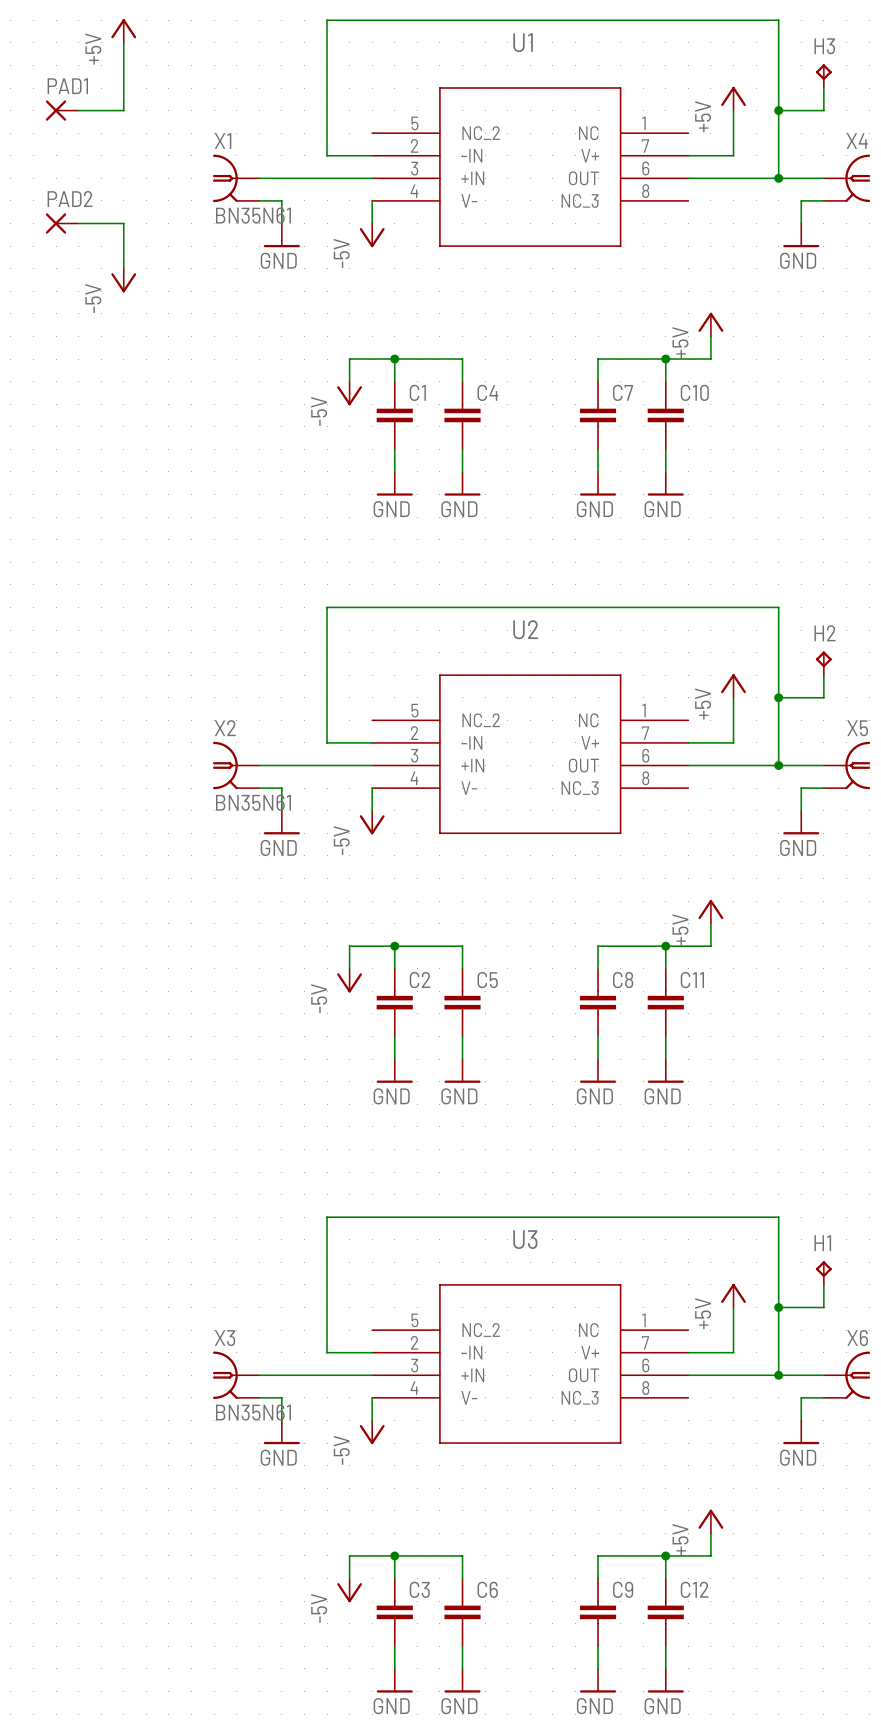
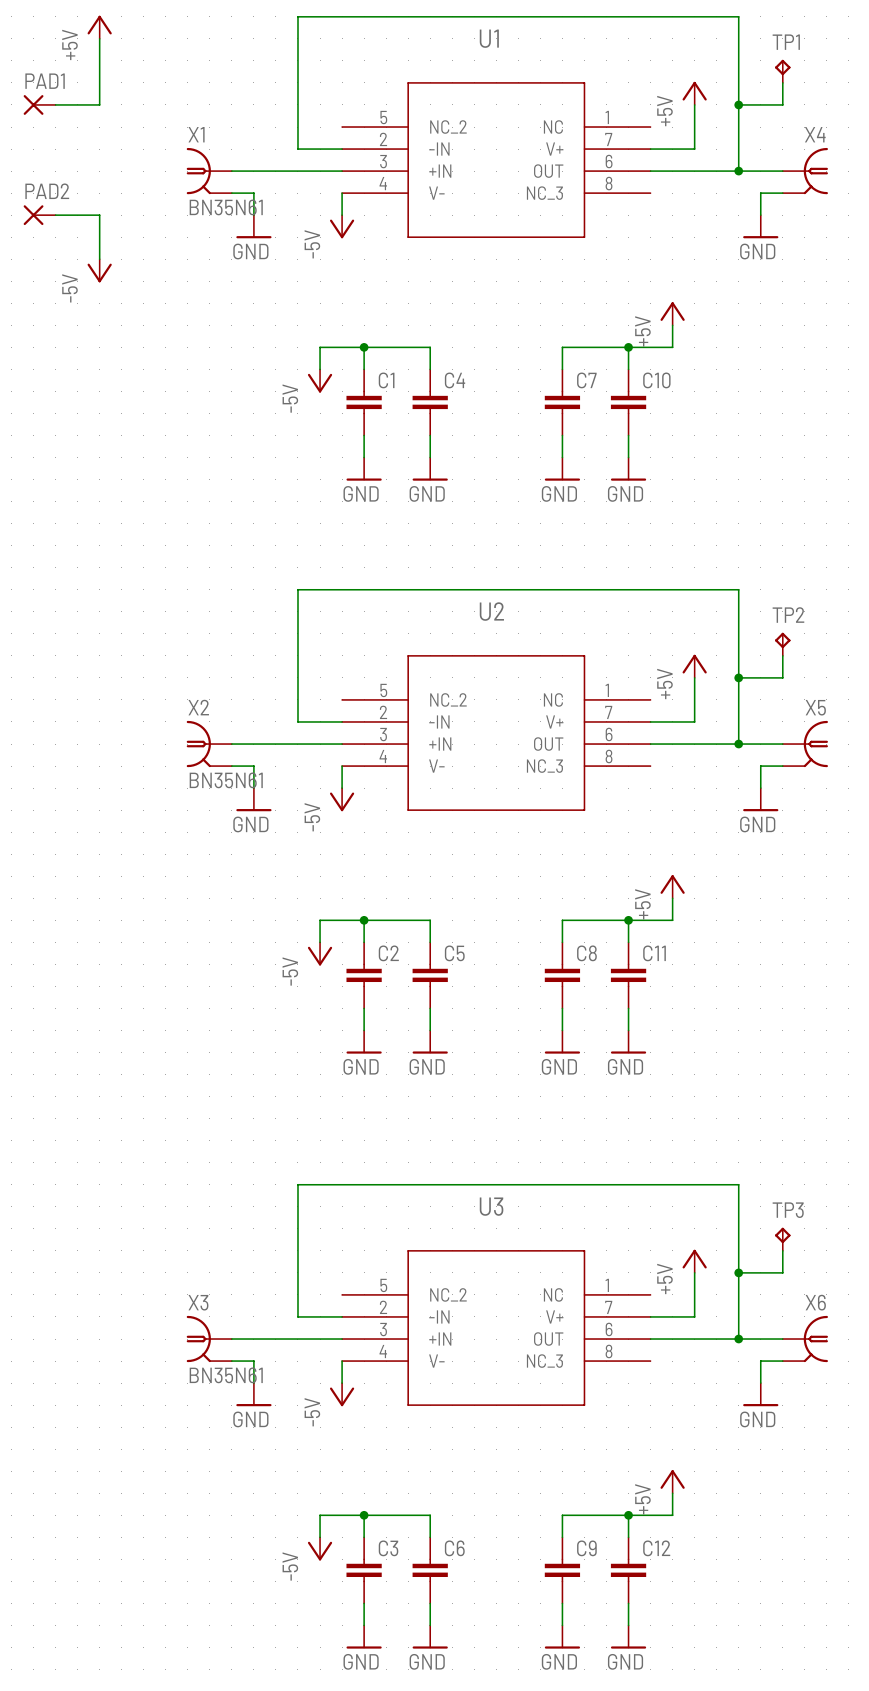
H3 name: H3 (824, 46) -> TP1 (786, 42)
H2 name: H2 (825, 633) -> TP2 (788, 615)
H1 name: H1 (822, 1243) -> TP3 (788, 1210)

